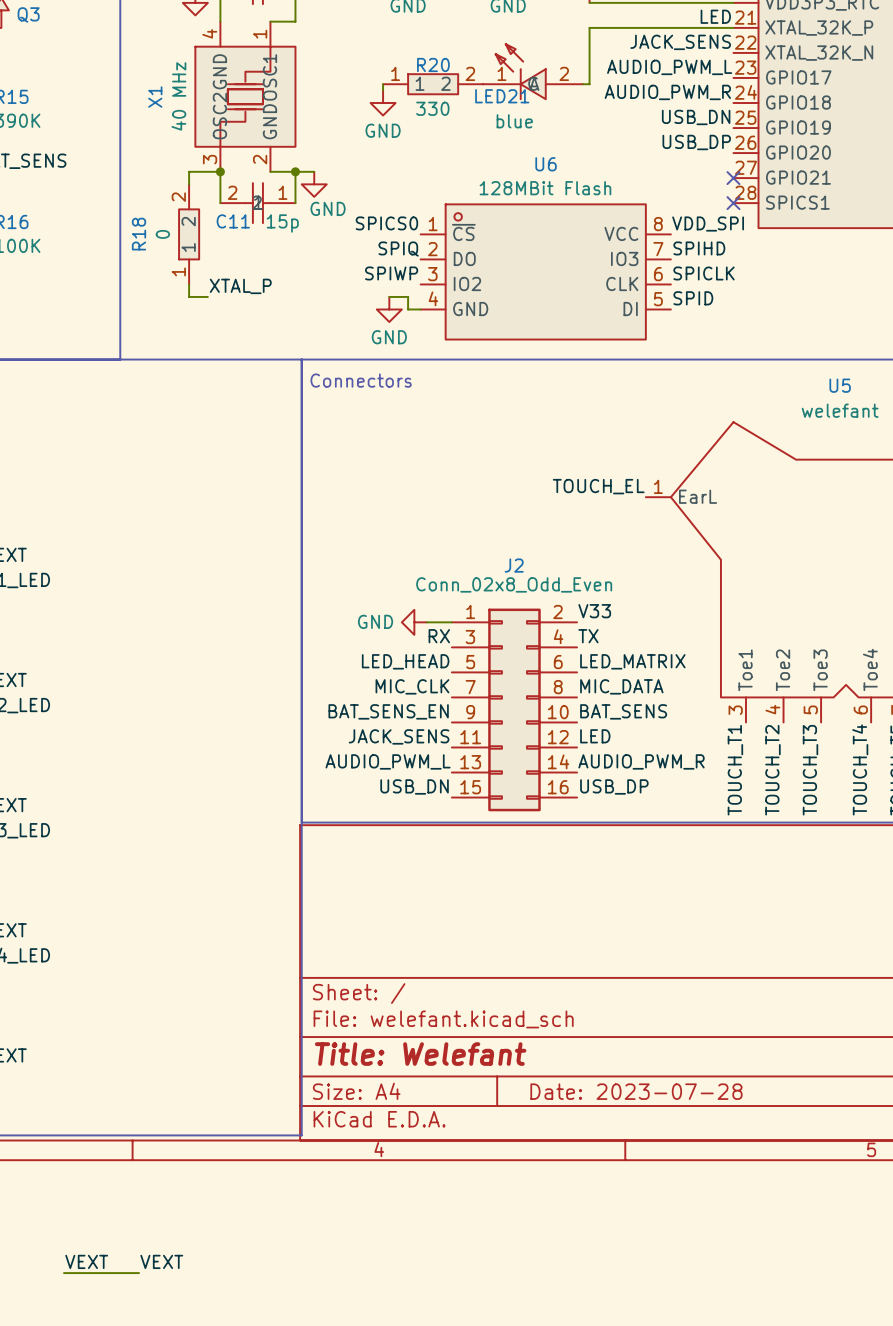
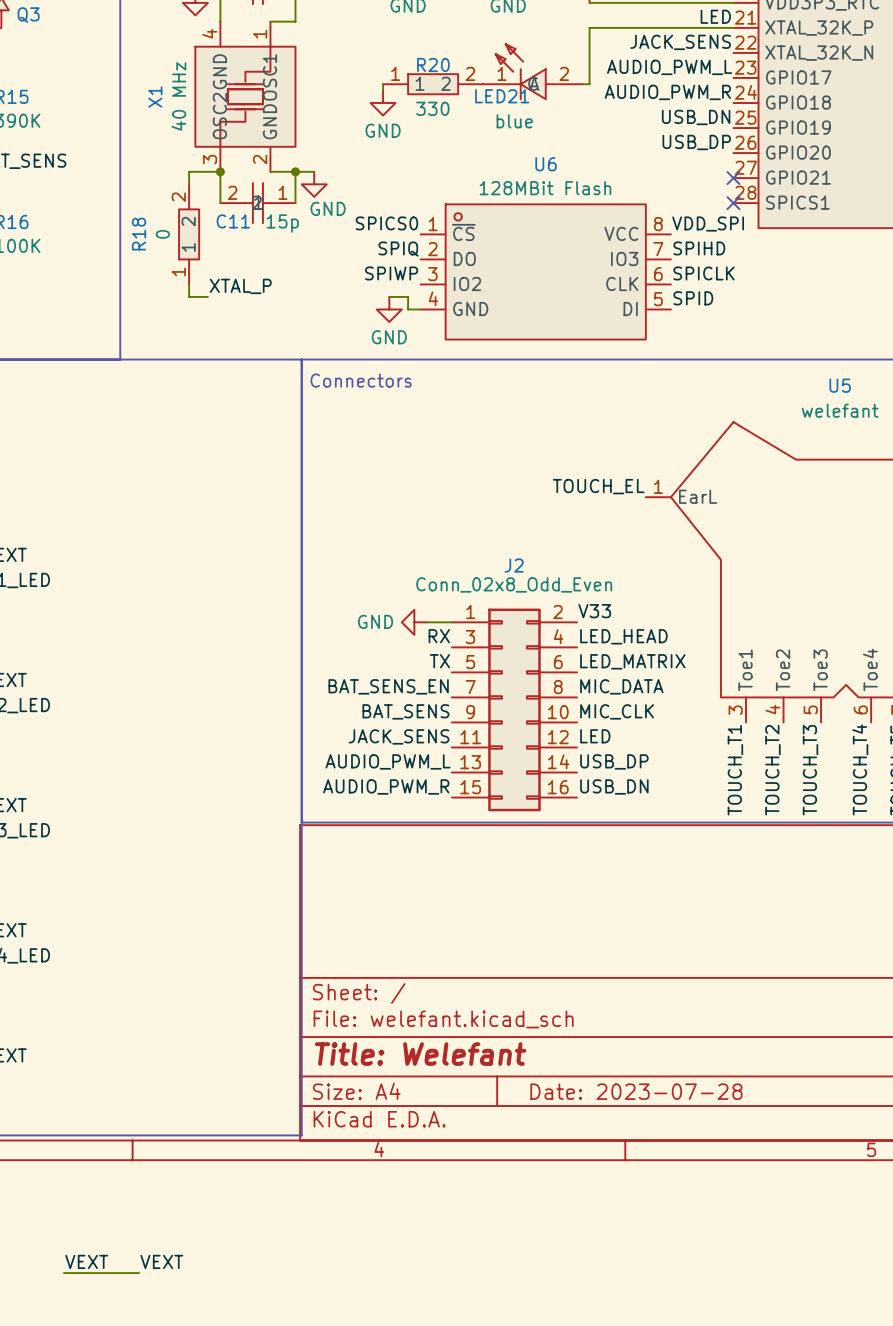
label: TX (588, 636) -> LED_HEAD (623, 636)
label: LED_HEAD (405, 661) -> TX (439, 661)
label: MIC_CLK (412, 686) -> BAT_SENS_EN (388, 686)
label: BAT_SENS_EN (388, 711) -> BAT_SENS (405, 711)
label: BAT_SENS (623, 711) -> MIC_CLK (617, 711)
label: AUDIO_PWM_R (641, 761) -> USB_DP (614, 761)
label: USB_DN (414, 786) -> AUDIO_PWM_R (386, 786)
label: USB_DP (614, 786) -> USB_DN (614, 786)

